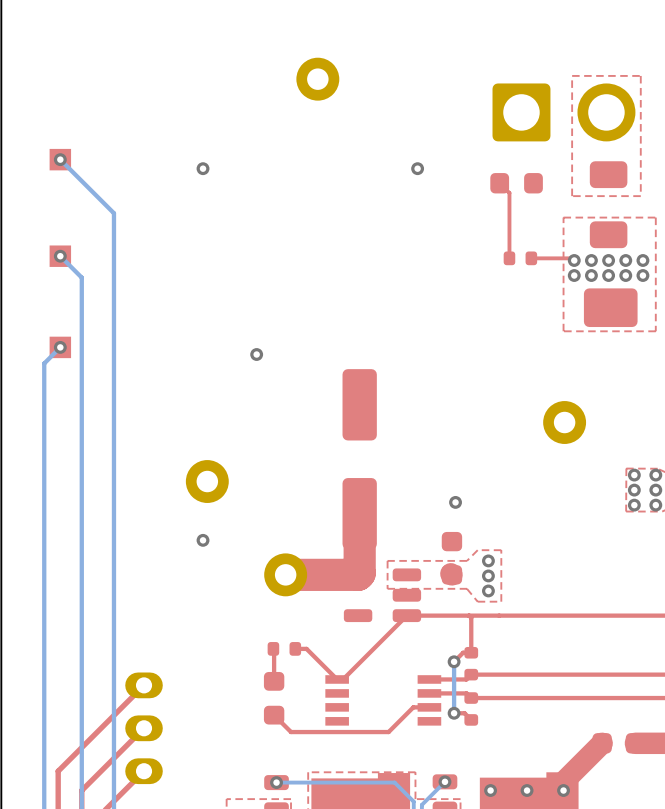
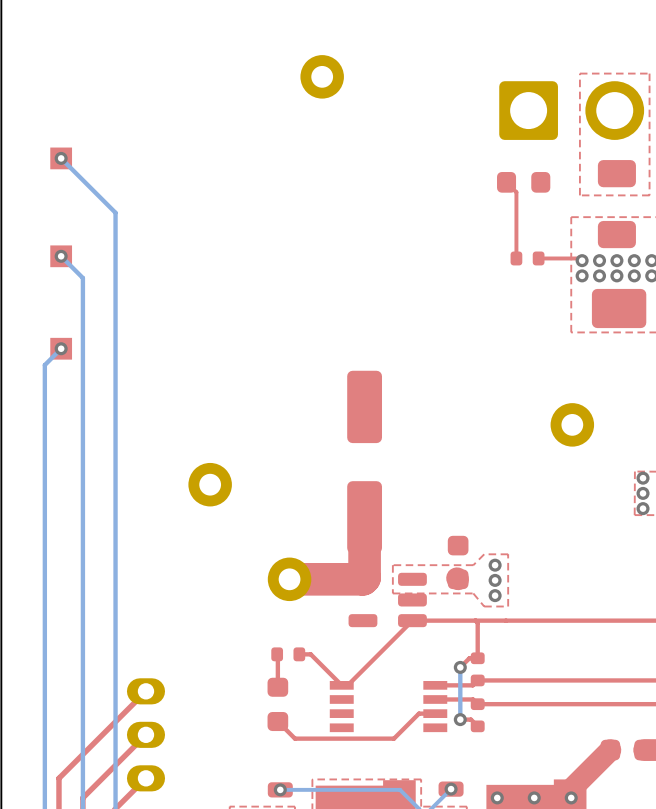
via: (203, 168) -> none
via: (417, 168) -> none
via: (256, 354) -> none
via: (455, 502) -> none
via: (203, 540) -> none

